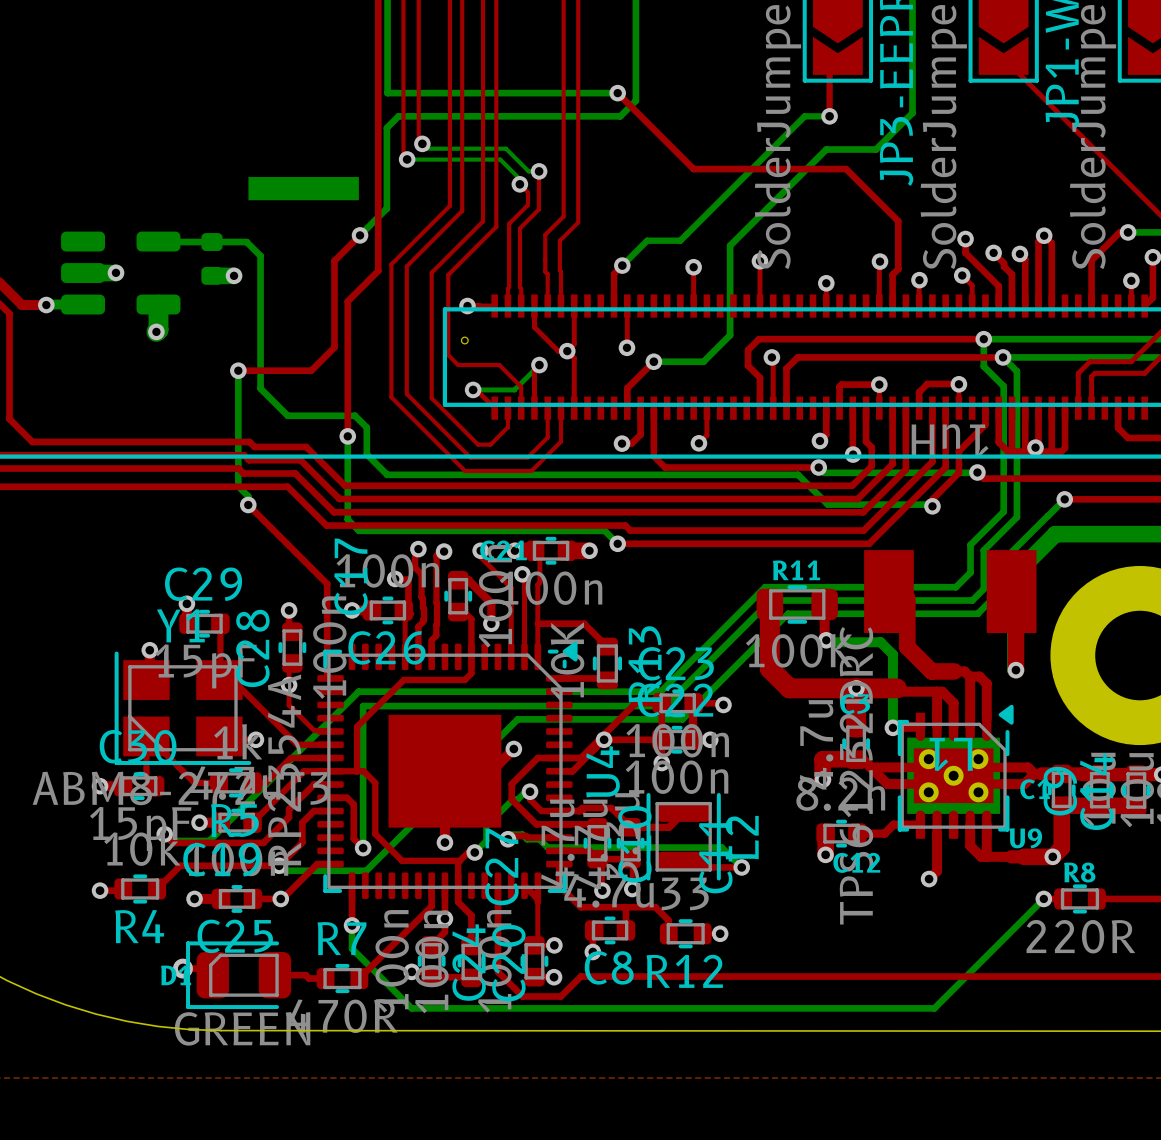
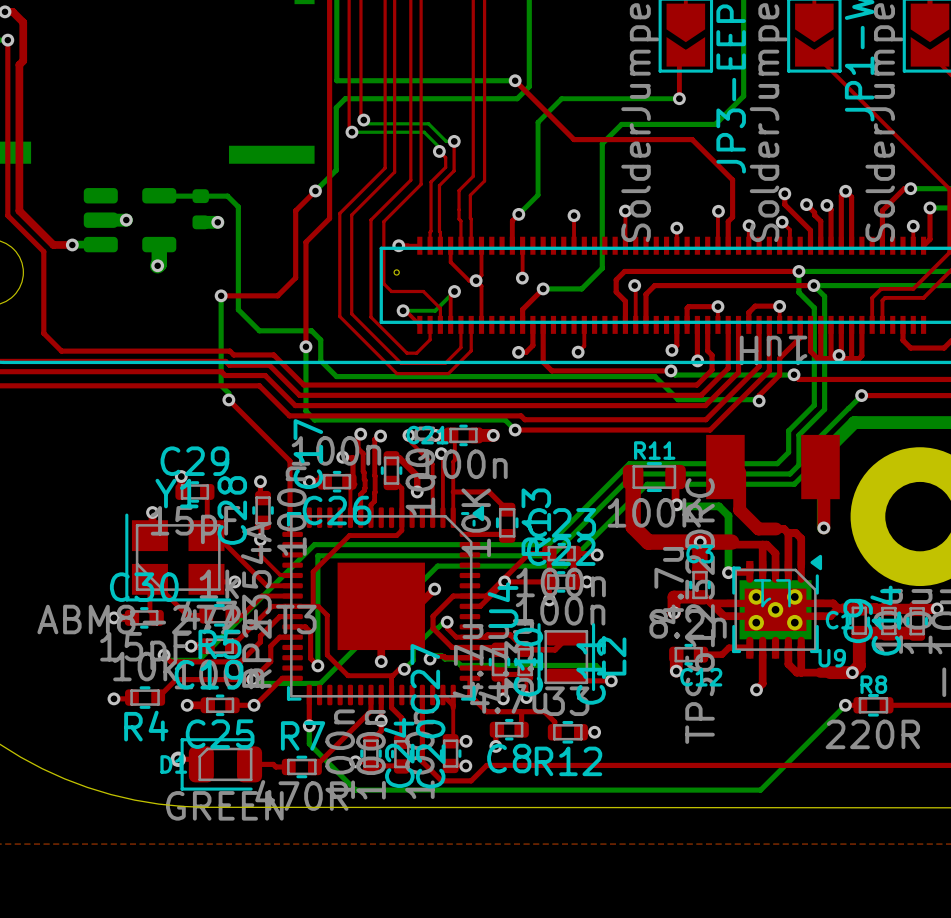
bottom track: (804, 116) (680, 240) (647, 240) -> (660, 98) (561, 98) (538, 122) (538, 195)
bottom track: (826, 149) (730, 245) -> (676, 124) (621, 124) (602, 143) (602, 198)

